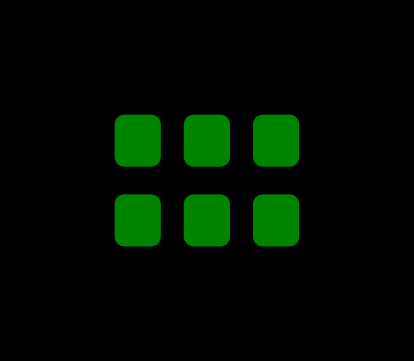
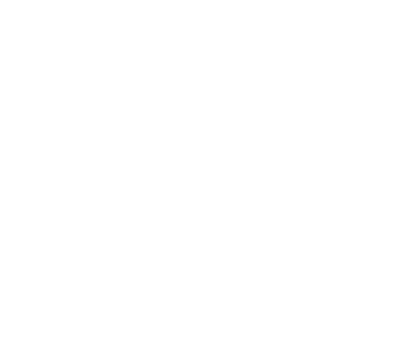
part: (137, 180) -> none
part: (206, 180) -> none
part: (276, 180) -> none

